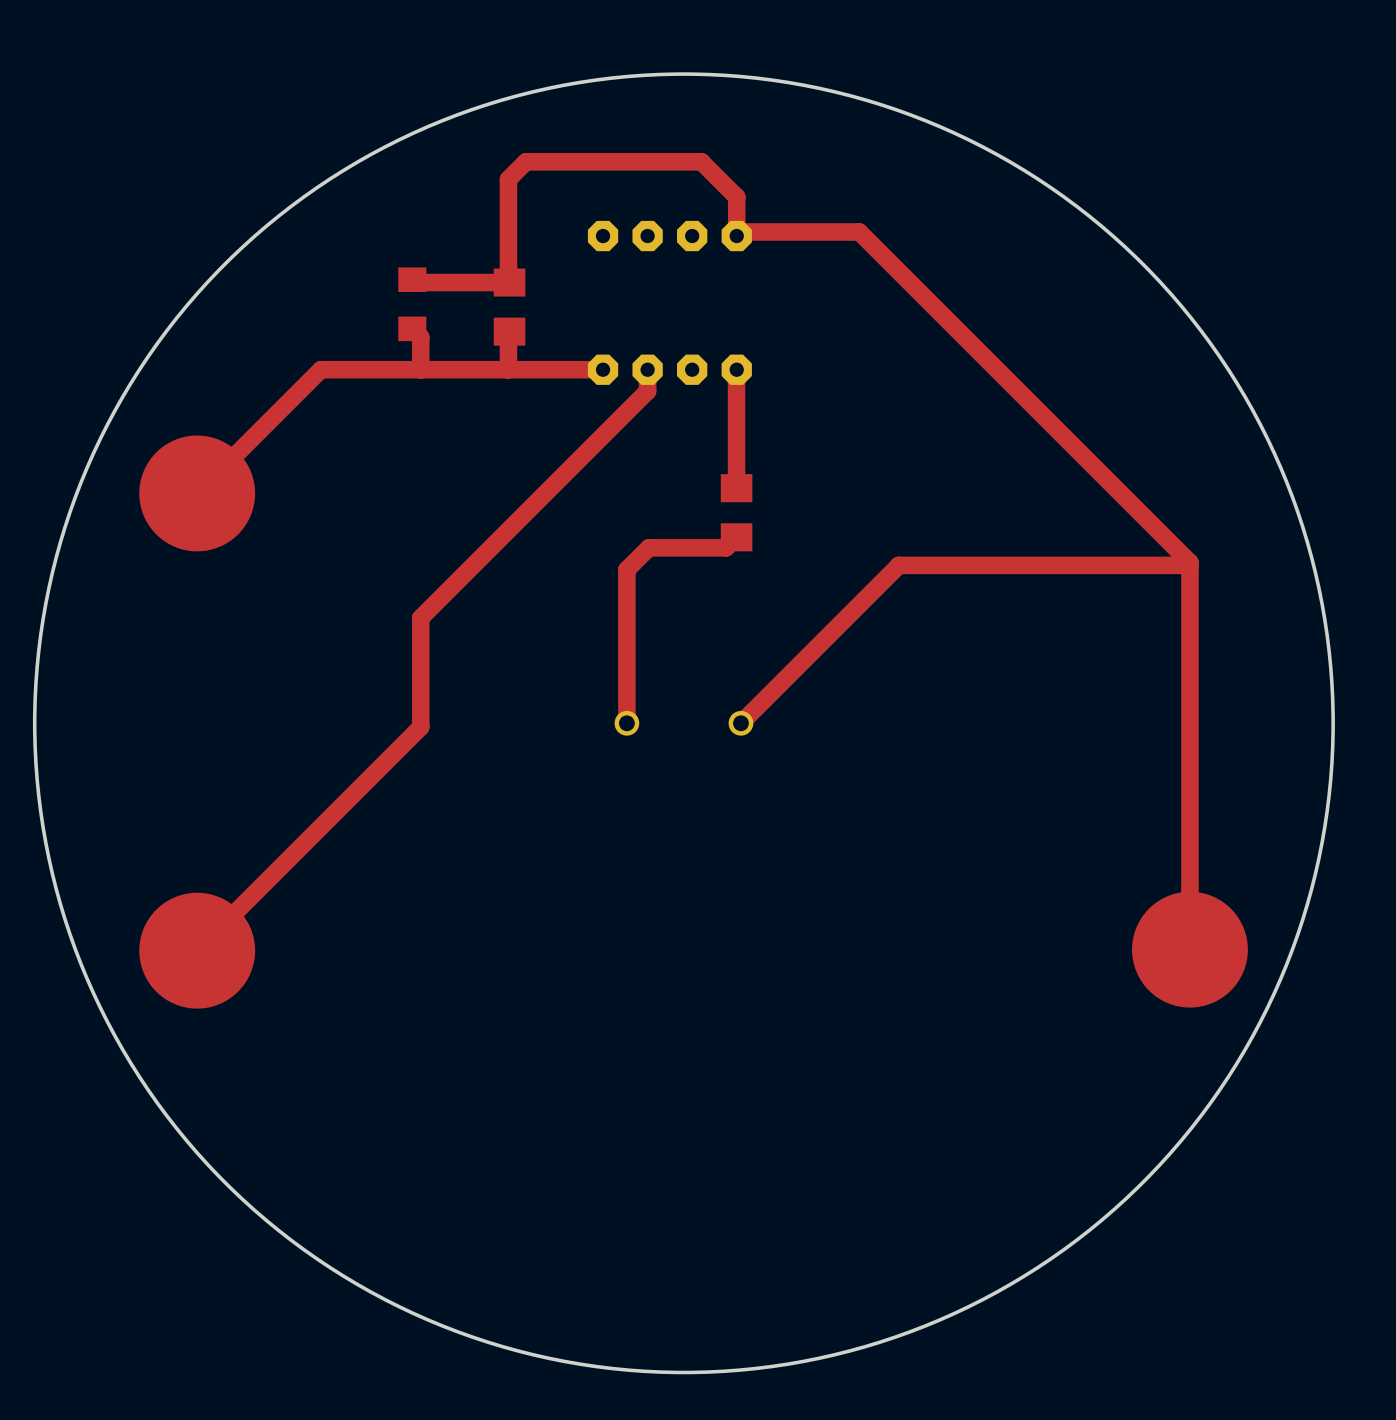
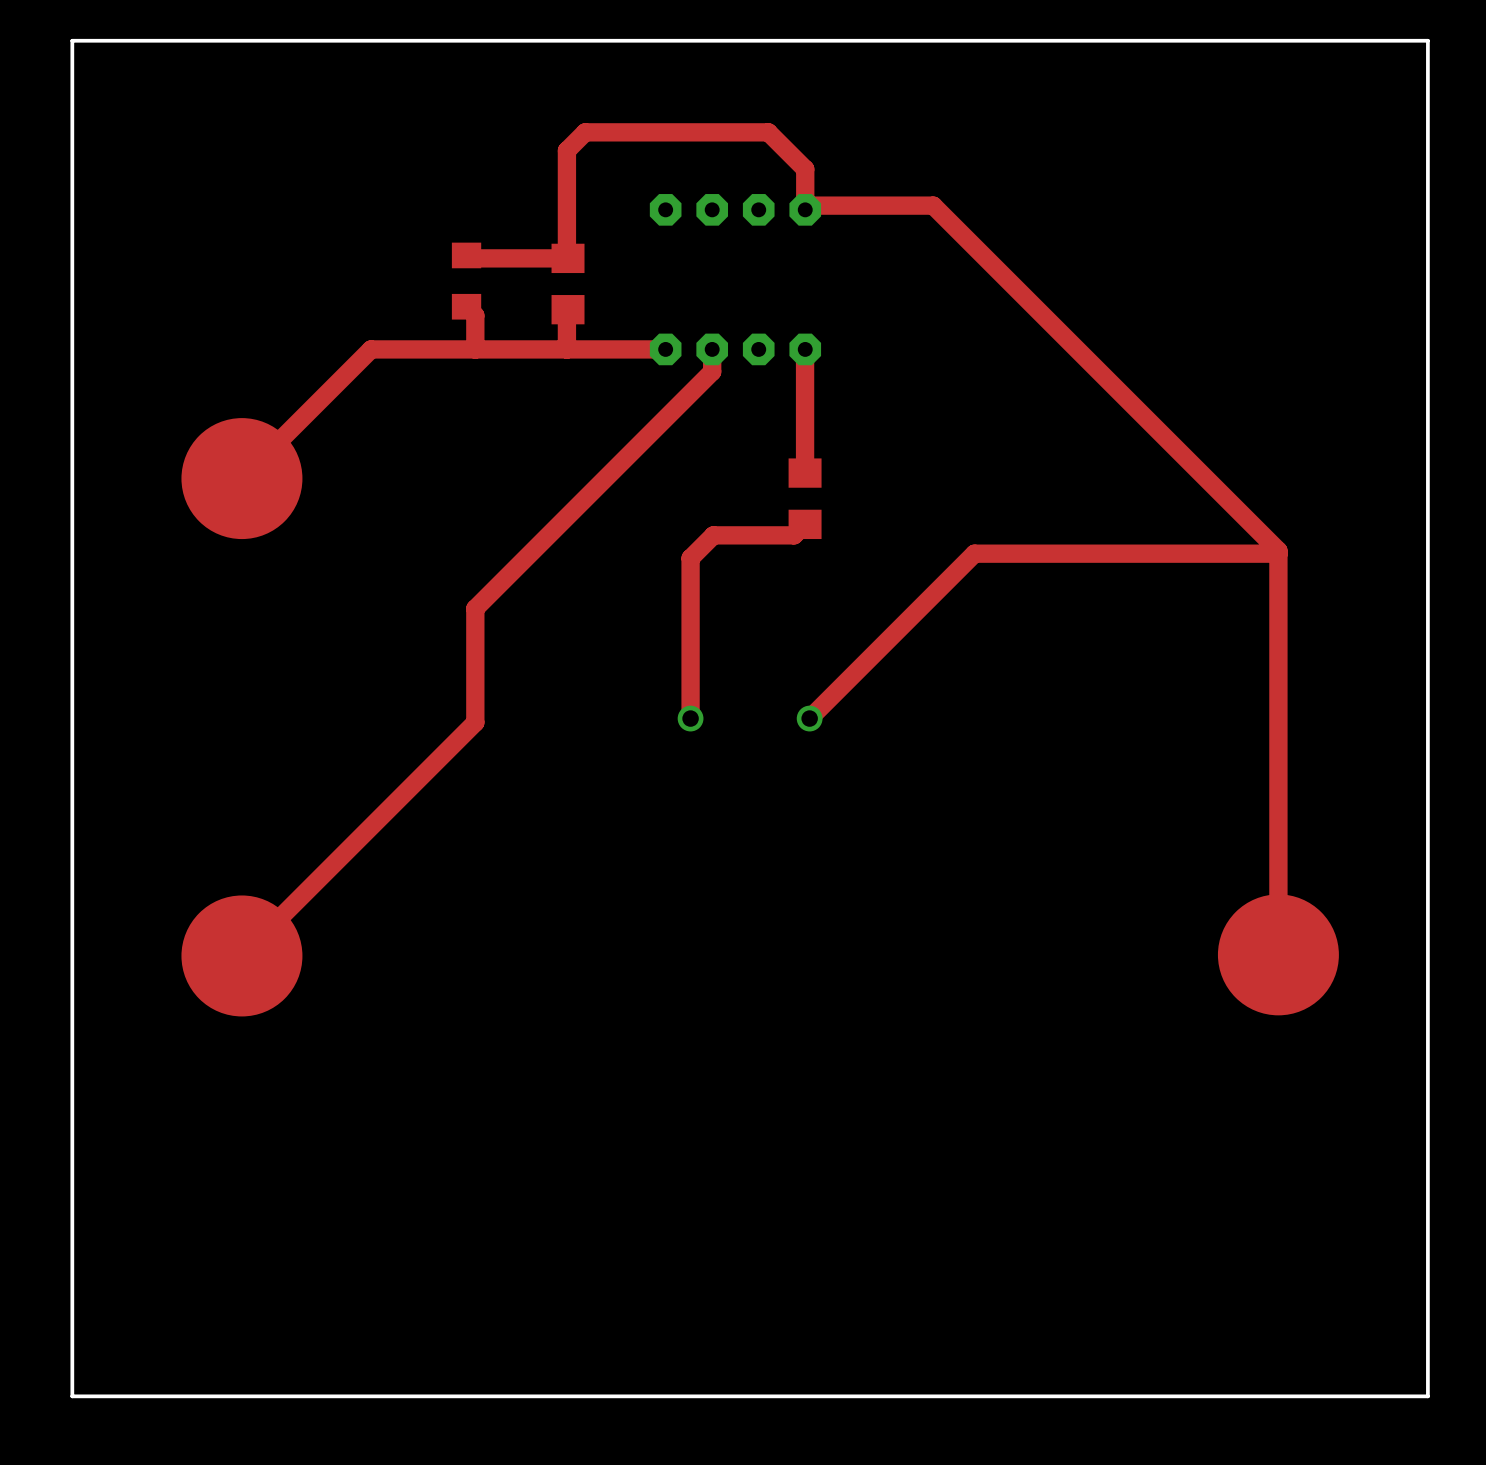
round board edge: [32, 72, 1335, 1375] -> none
board edge: none -> (1427, 40) (1427, 1396) (72, 1396) (72, 40) (1427, 40)

